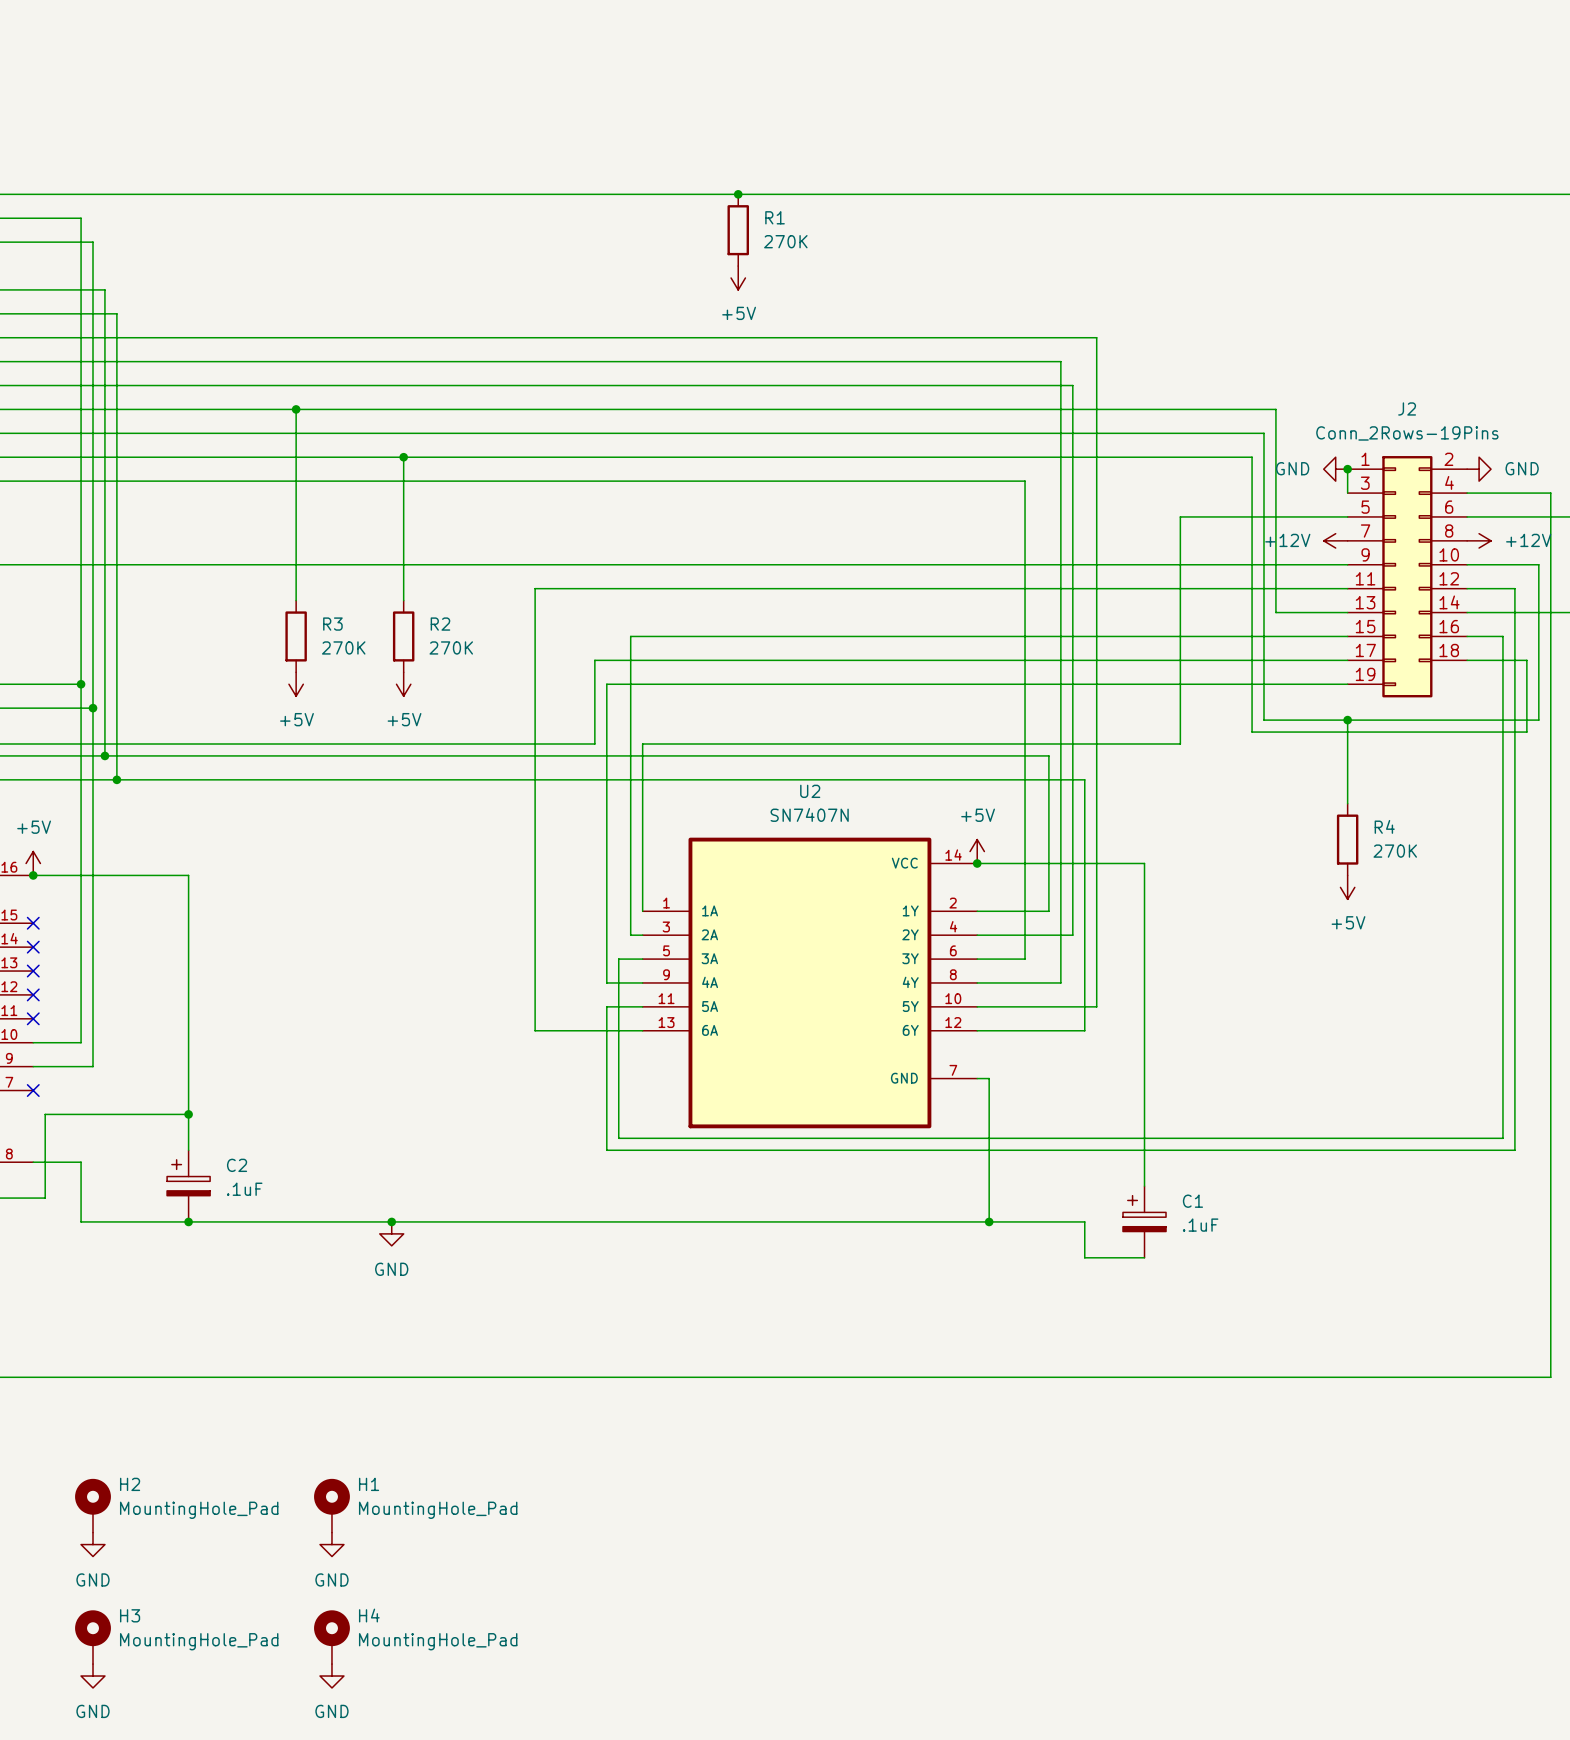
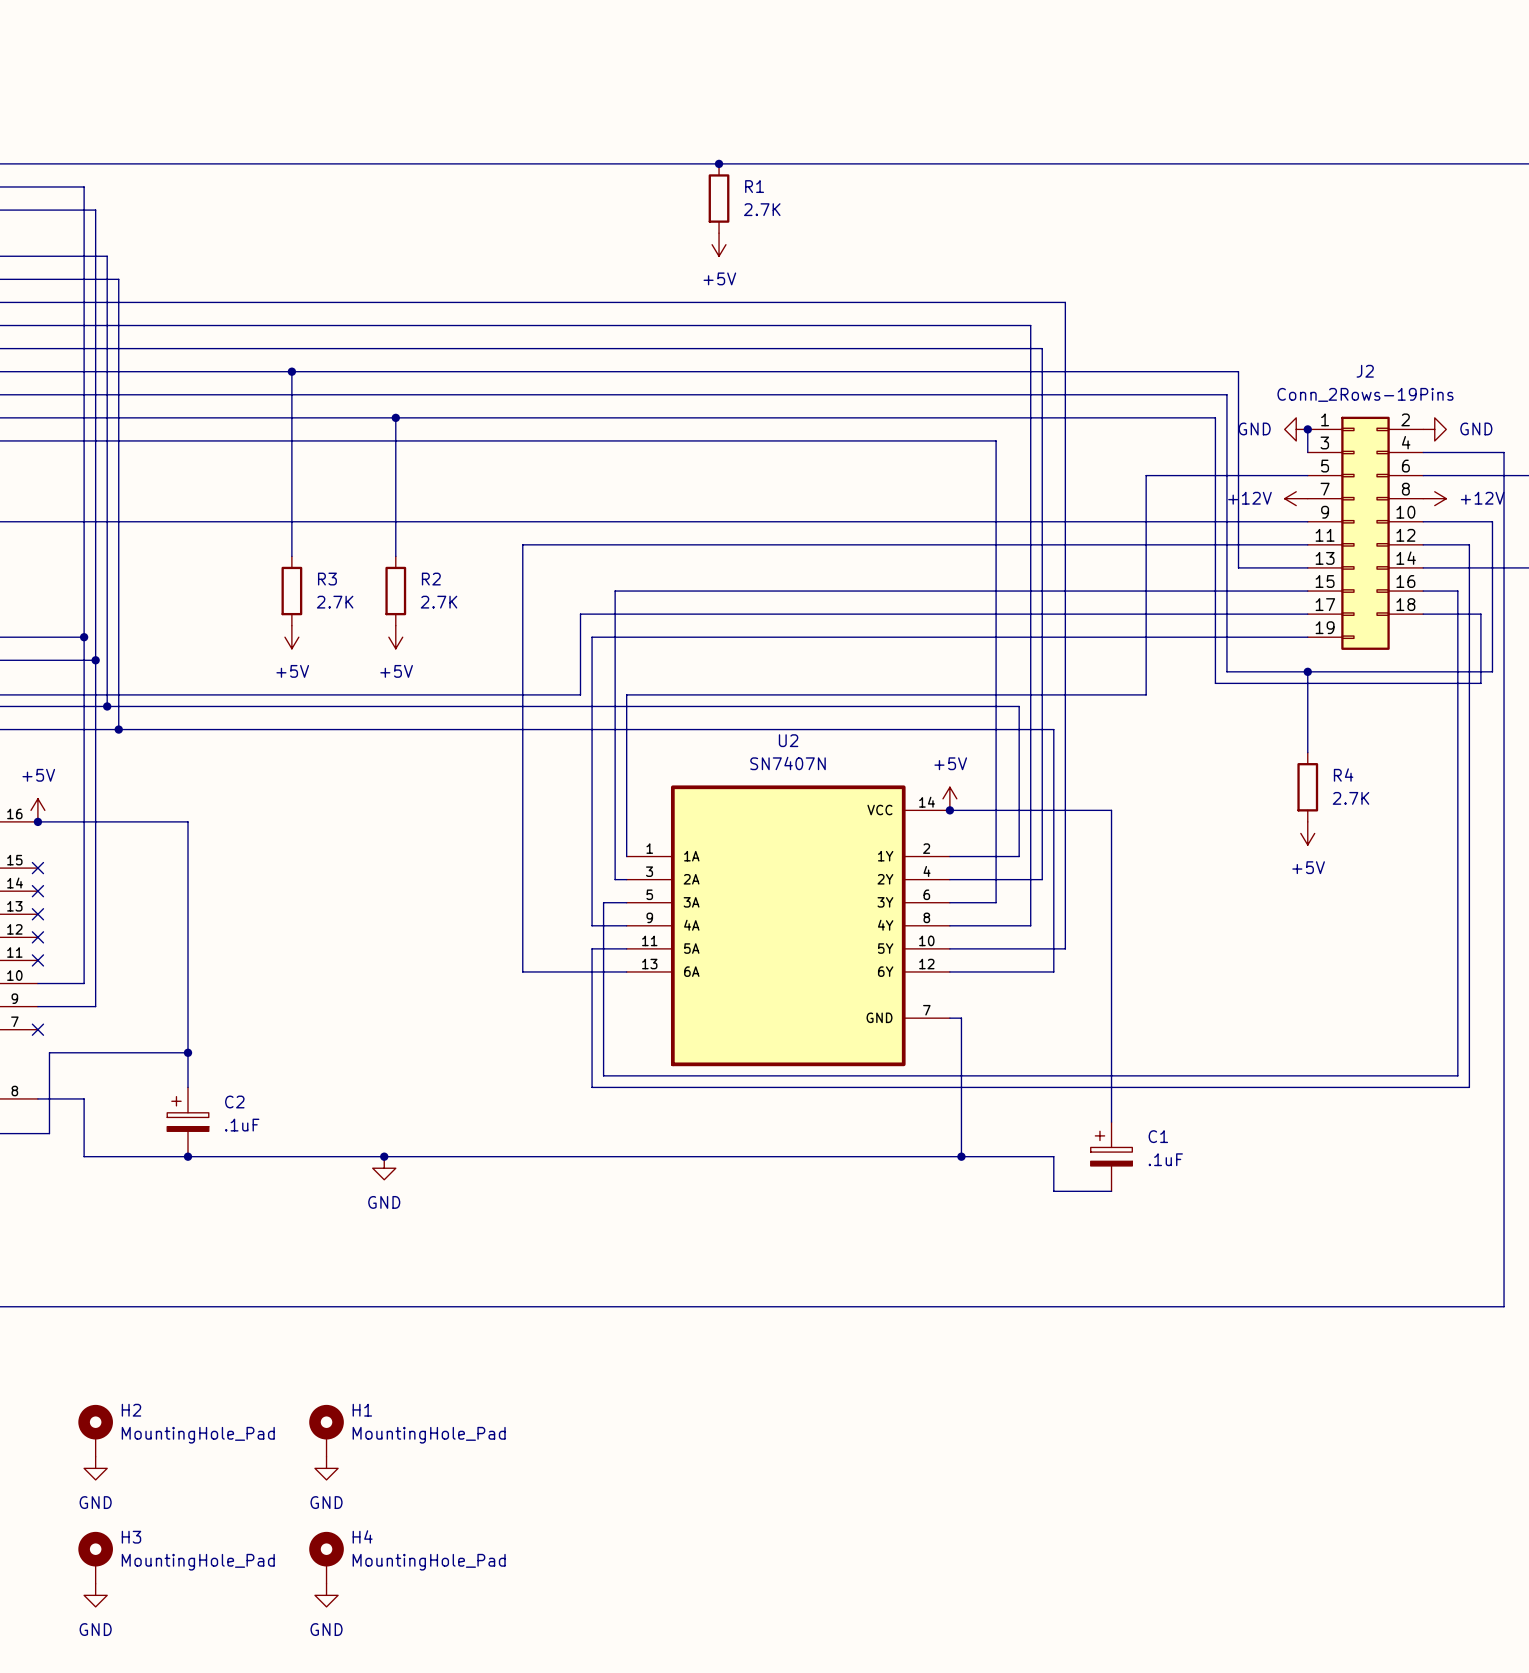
R1 value: 270K (785, 241) -> 2.7K (762, 209)
R3 value: 270K (343, 647) -> 2.7K (335, 602)
R2 value: 270K (451, 647) -> 2.7K (439, 602)
R4 value: 270K (1395, 851) -> 2.7K (1351, 798)

